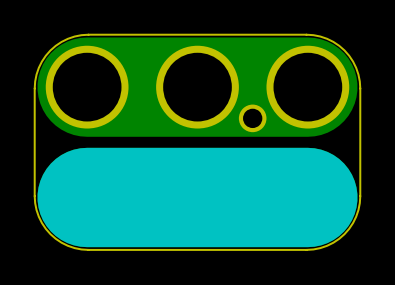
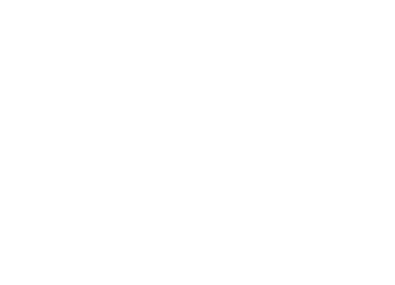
part: (197, 142) -> none

